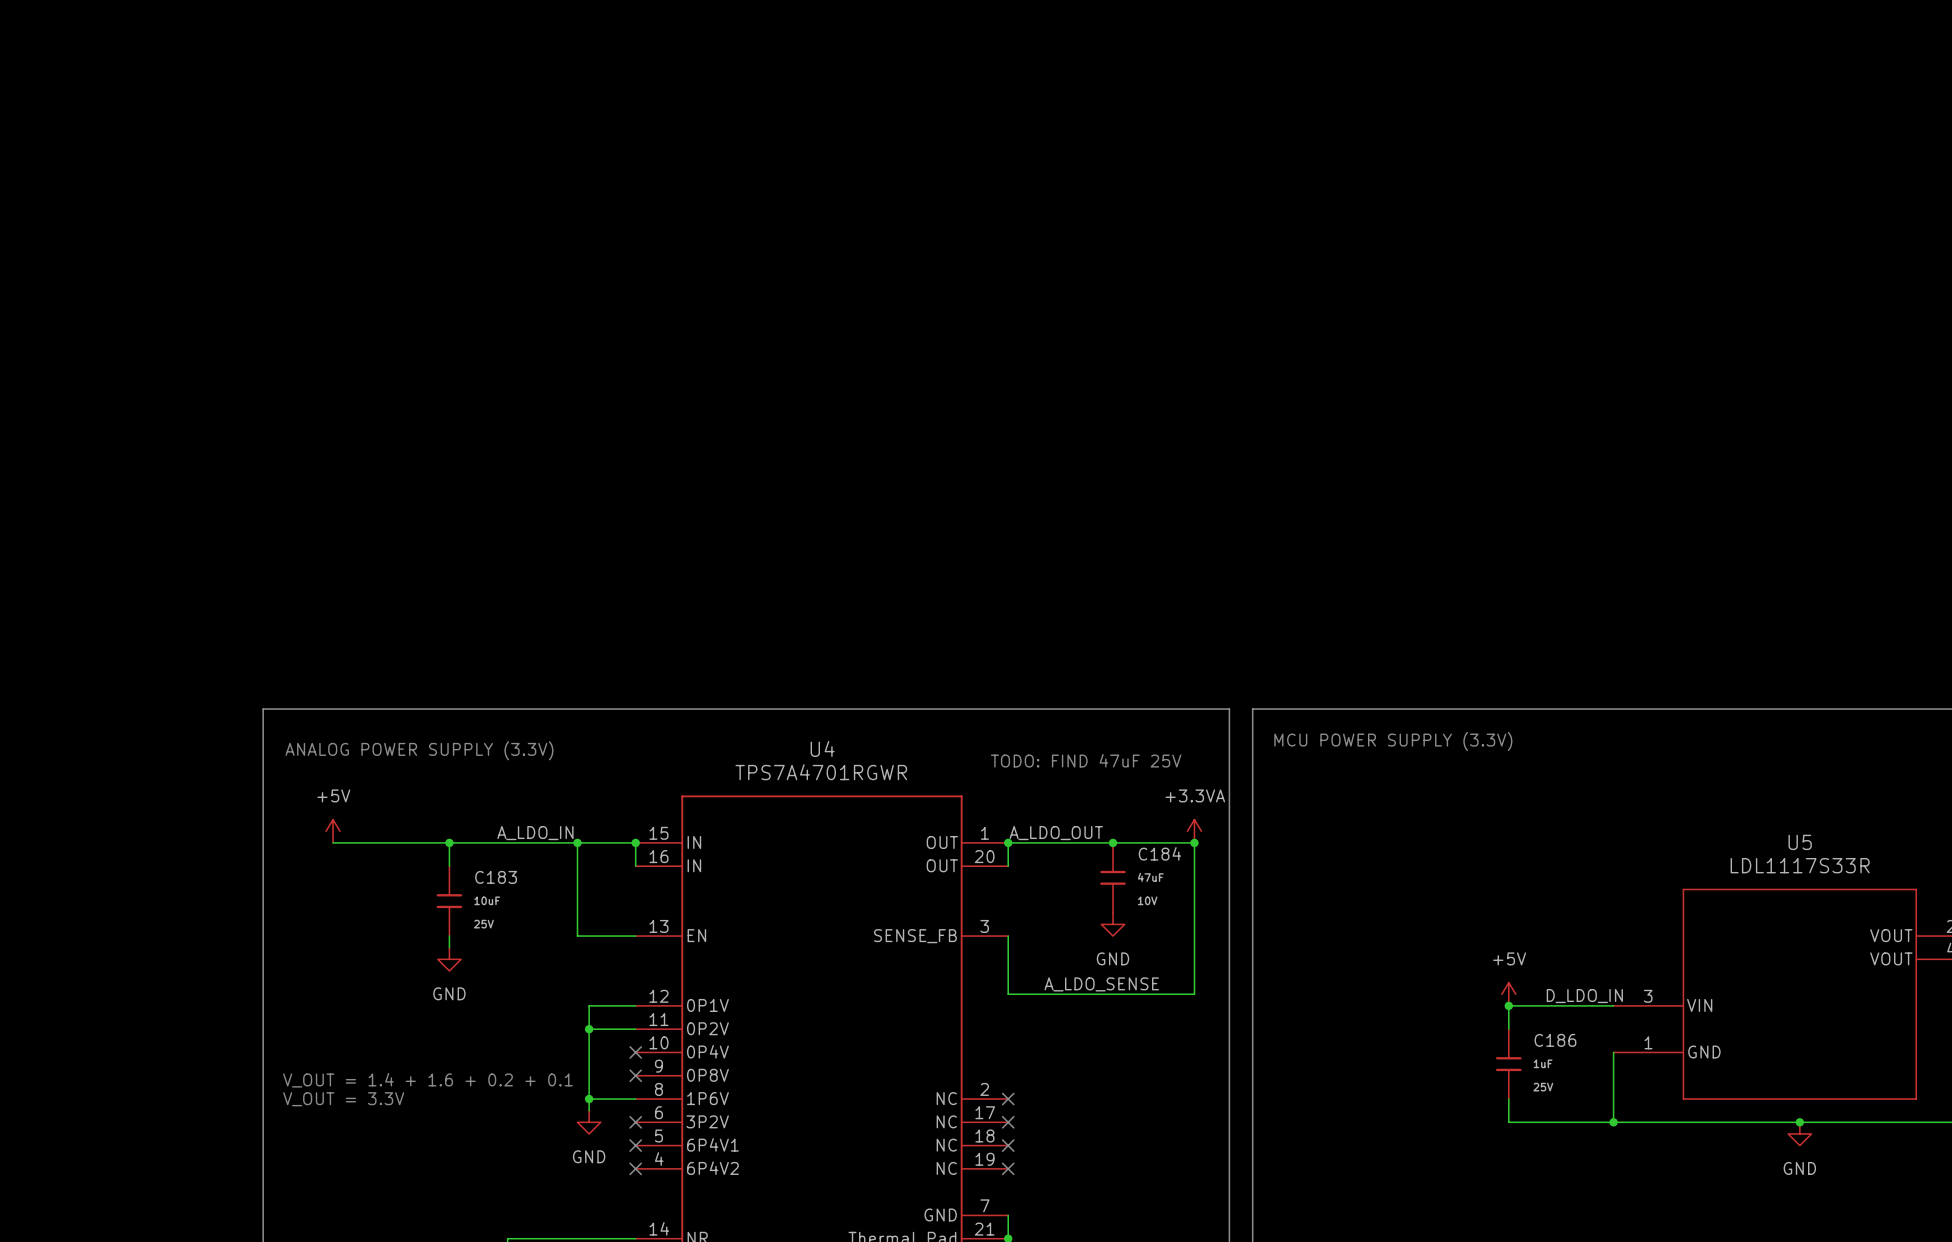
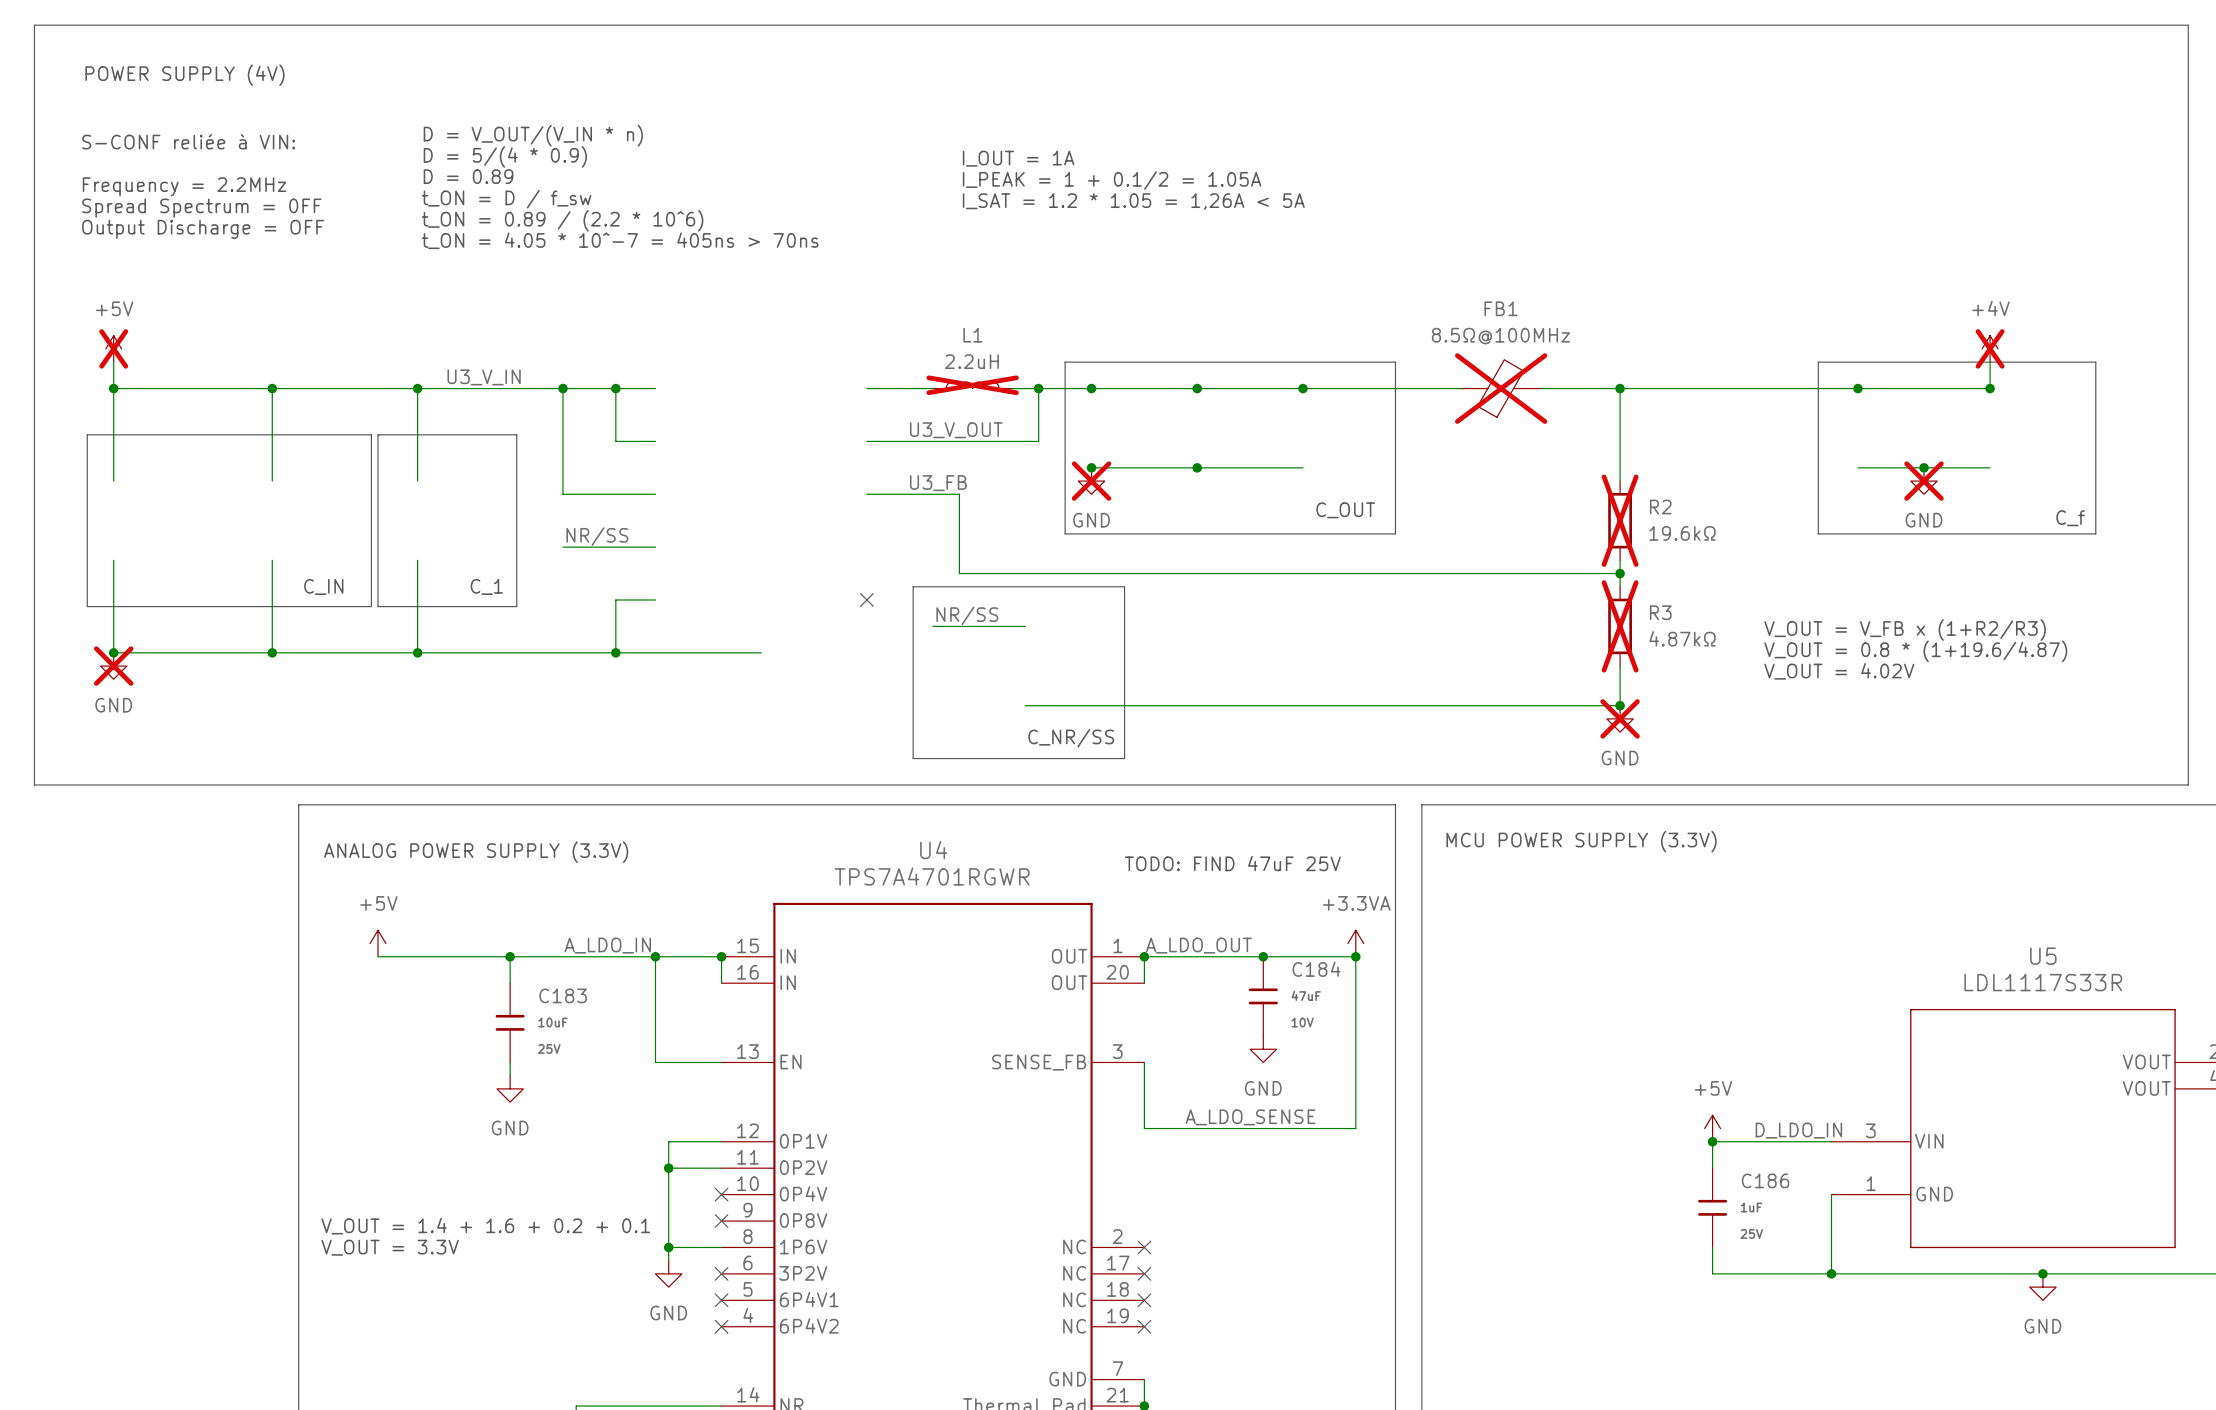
line: none -> (34, 25) (2188, 25) (2188, 784) (34, 784) (34, 25)
text: none -> POWER SUPPLY (4V) (184, 75)
text: none -> D = V_OUT/(V_IN * n) (533, 135)
text: none -> S-CONF reliée à VIN: (188, 141)
text: none -> D = 5/(4 * 0.9) (505, 156)
text: none -> I_OUT = 1A (1018, 158)
text: none -> D = 0.89 (468, 176)
text: none -> I_PEAK = 1 + 0.1/2 = 1.05A (1112, 180)
text: none -> Frequency = 2.2MHz (184, 186)
text: none -> t_ON = D / f_sw (506, 199)
text: none -> I_SAT = 1.2 * 1.05 = 1,26A < 5A (1133, 201)
text: none -> Spread Spectrum = 0FF (201, 208)
text: none -> t_ON = 0.89 / (2.2 * 10^6) (562, 220)
text: none -> Output Discharge = OFF (203, 229)
text: none -> t_ON = 4.05 * 10^-7 = 405ns > 70ns (620, 240)
power symbol: none -> +5V (113, 348)
power symbol: none -> +4V (1990, 348)
wire: none -> (113, 362) (113, 481)
line: none -> (1065, 362) (1395, 362) (1395, 533) (1065, 533) (1065, 362)
line: none -> (1818, 362) (2095, 362) (2095, 533) (1818, 533) (1818, 362)
wire: none -> (1990, 362) (1990, 388) (1540, 388)
label: none -> U3_V_IN (484, 377)
L1: none -> 2.2uH (972, 385)
wire: none -> (113, 388) (655, 388)
junction: none -> (113, 388)
wire: none -> (272, 388) (272, 481)
junction: none -> (272, 388)
wire: none -> (417, 388) (417, 481)
junction: none -> (417, 388)
wire: none -> (562, 388) (562, 494) (655, 494)
junction: none -> (562, 388)
wire: none -> (615, 388) (615, 441) (655, 441)
junction: none -> (615, 388)
wire: none -> (866, 388) (932, 388)
wire: none -> (1012, 388) (1461, 388)
wire: none -> (1038, 388) (1038, 441) (866, 441)
junction: none -> (1038, 388)
junction: none -> (1091, 388)
junction: none -> (1197, 388)
junction: none -> (1302, 388)
FB1: none -> 8.5Ω@100MHz (1501, 388)
wire: none -> (1620, 388) (1620, 481)
junction: none -> (1620, 388)
junction: none -> (1857, 388)
junction: none -> (1990, 388)
label: none -> U3_V_OUT (956, 430)
line: none -> (87, 434) (371, 434) (371, 606) (87, 606) (87, 434)
line: none -> (377, 434) (516, 434) (516, 606) (377, 606) (377, 434)
wire: none -> (1091, 467) (1302, 467)
junction: none -> (1091, 467)
junction: none -> (1197, 467)
wire: none -> (1857, 467) (1990, 467)
junction: none -> (1924, 467)
power symbol: none -> GND (1091, 481)
power symbol: none -> GND (1924, 481)
label: none -> U3_FB (938, 483)
wire: none -> (866, 494) (959, 494) (959, 573) (1620, 573)
text: none -> C_OUT (1345, 510)
text: none -> C_f (2070, 518)
R2: none -> 19.6kΩ (1620, 520)
label: none -> NR/SS (597, 536)
wire: none -> (562, 547) (655, 547)
wire: none -> (113, 560) (113, 652) (761, 652)
wire: none -> (272, 560) (272, 652)
wire: none -> (417, 560) (417, 652)
wire: none -> (1620, 560) (1620, 586)
junction: none -> (1620, 573)
line: none -> (913, 586) (1124, 586) (1124, 758) (913, 758) (913, 586)
text: none -> C_IN (323, 586)
text: none -> C_1 (486, 586)
wire: none -> (655, 599) (615, 599) (615, 652)
no-connect mark: none -> (866, 599)
label: none -> NR/SS (967, 615)
wire: none -> (932, 626) (1025, 626)
R3: none -> 4.87kΩ (1620, 626)
text: none -> V_OUT = V_FB x (1+R2/R3) (1905, 630)
text: none -> V_OUT = 0.8 * (1+19.6/4.87) (1915, 651)
junction: none -> (113, 652)
junction: none -> (272, 652)
junction: none -> (417, 652)
junction: none -> (615, 652)
power symbol: none -> GND (113, 666)
wire: none -> (1620, 666) (1620, 705) (1025, 705)
text: none -> V_OUT = 4.02V (1839, 671)
junction: none -> (1620, 705)
power symbol: none -> GND (1620, 718)
text: none -> C_NR/SS (1071, 738)

